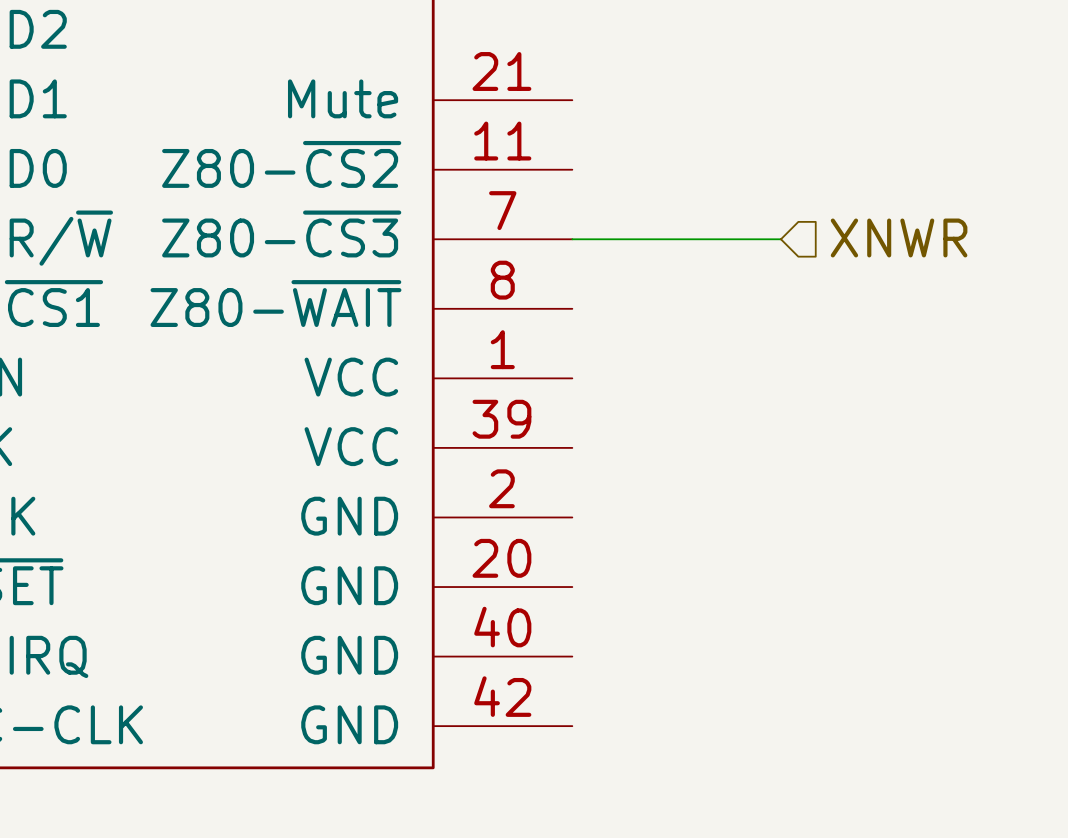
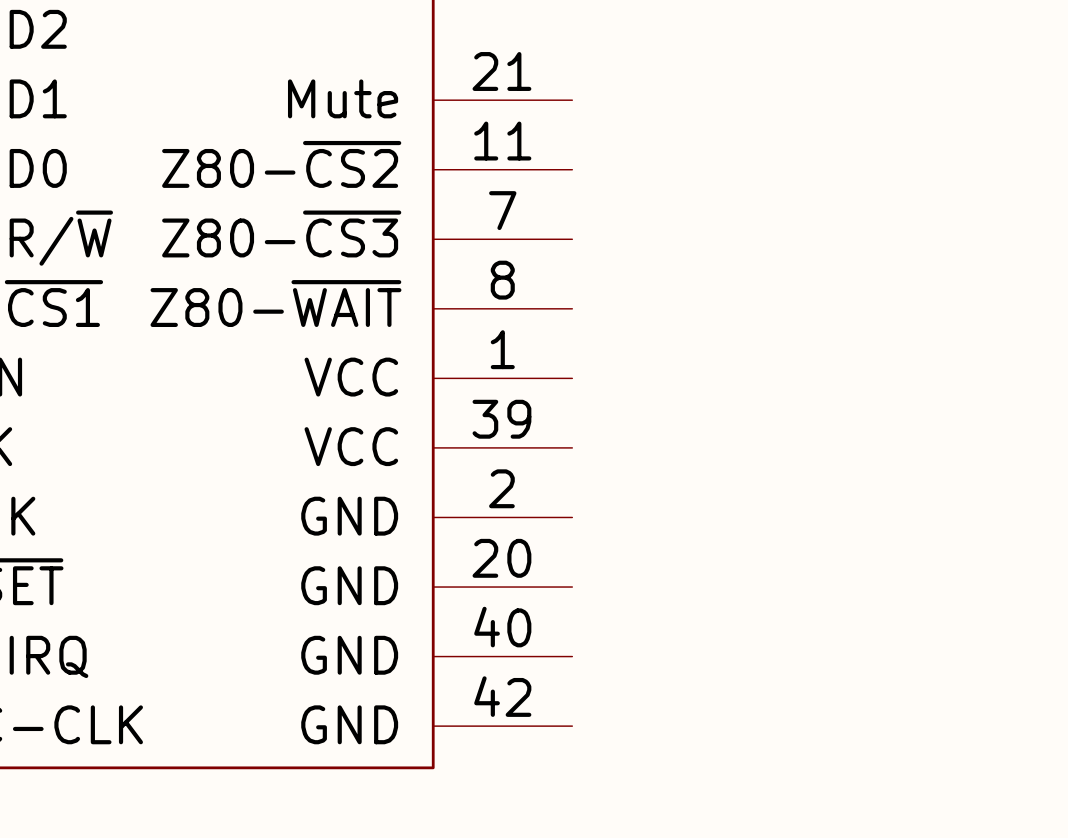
hierarchical label: XNWR (899, 237) -> none
wire: (572, 239) (780, 239) -> none

